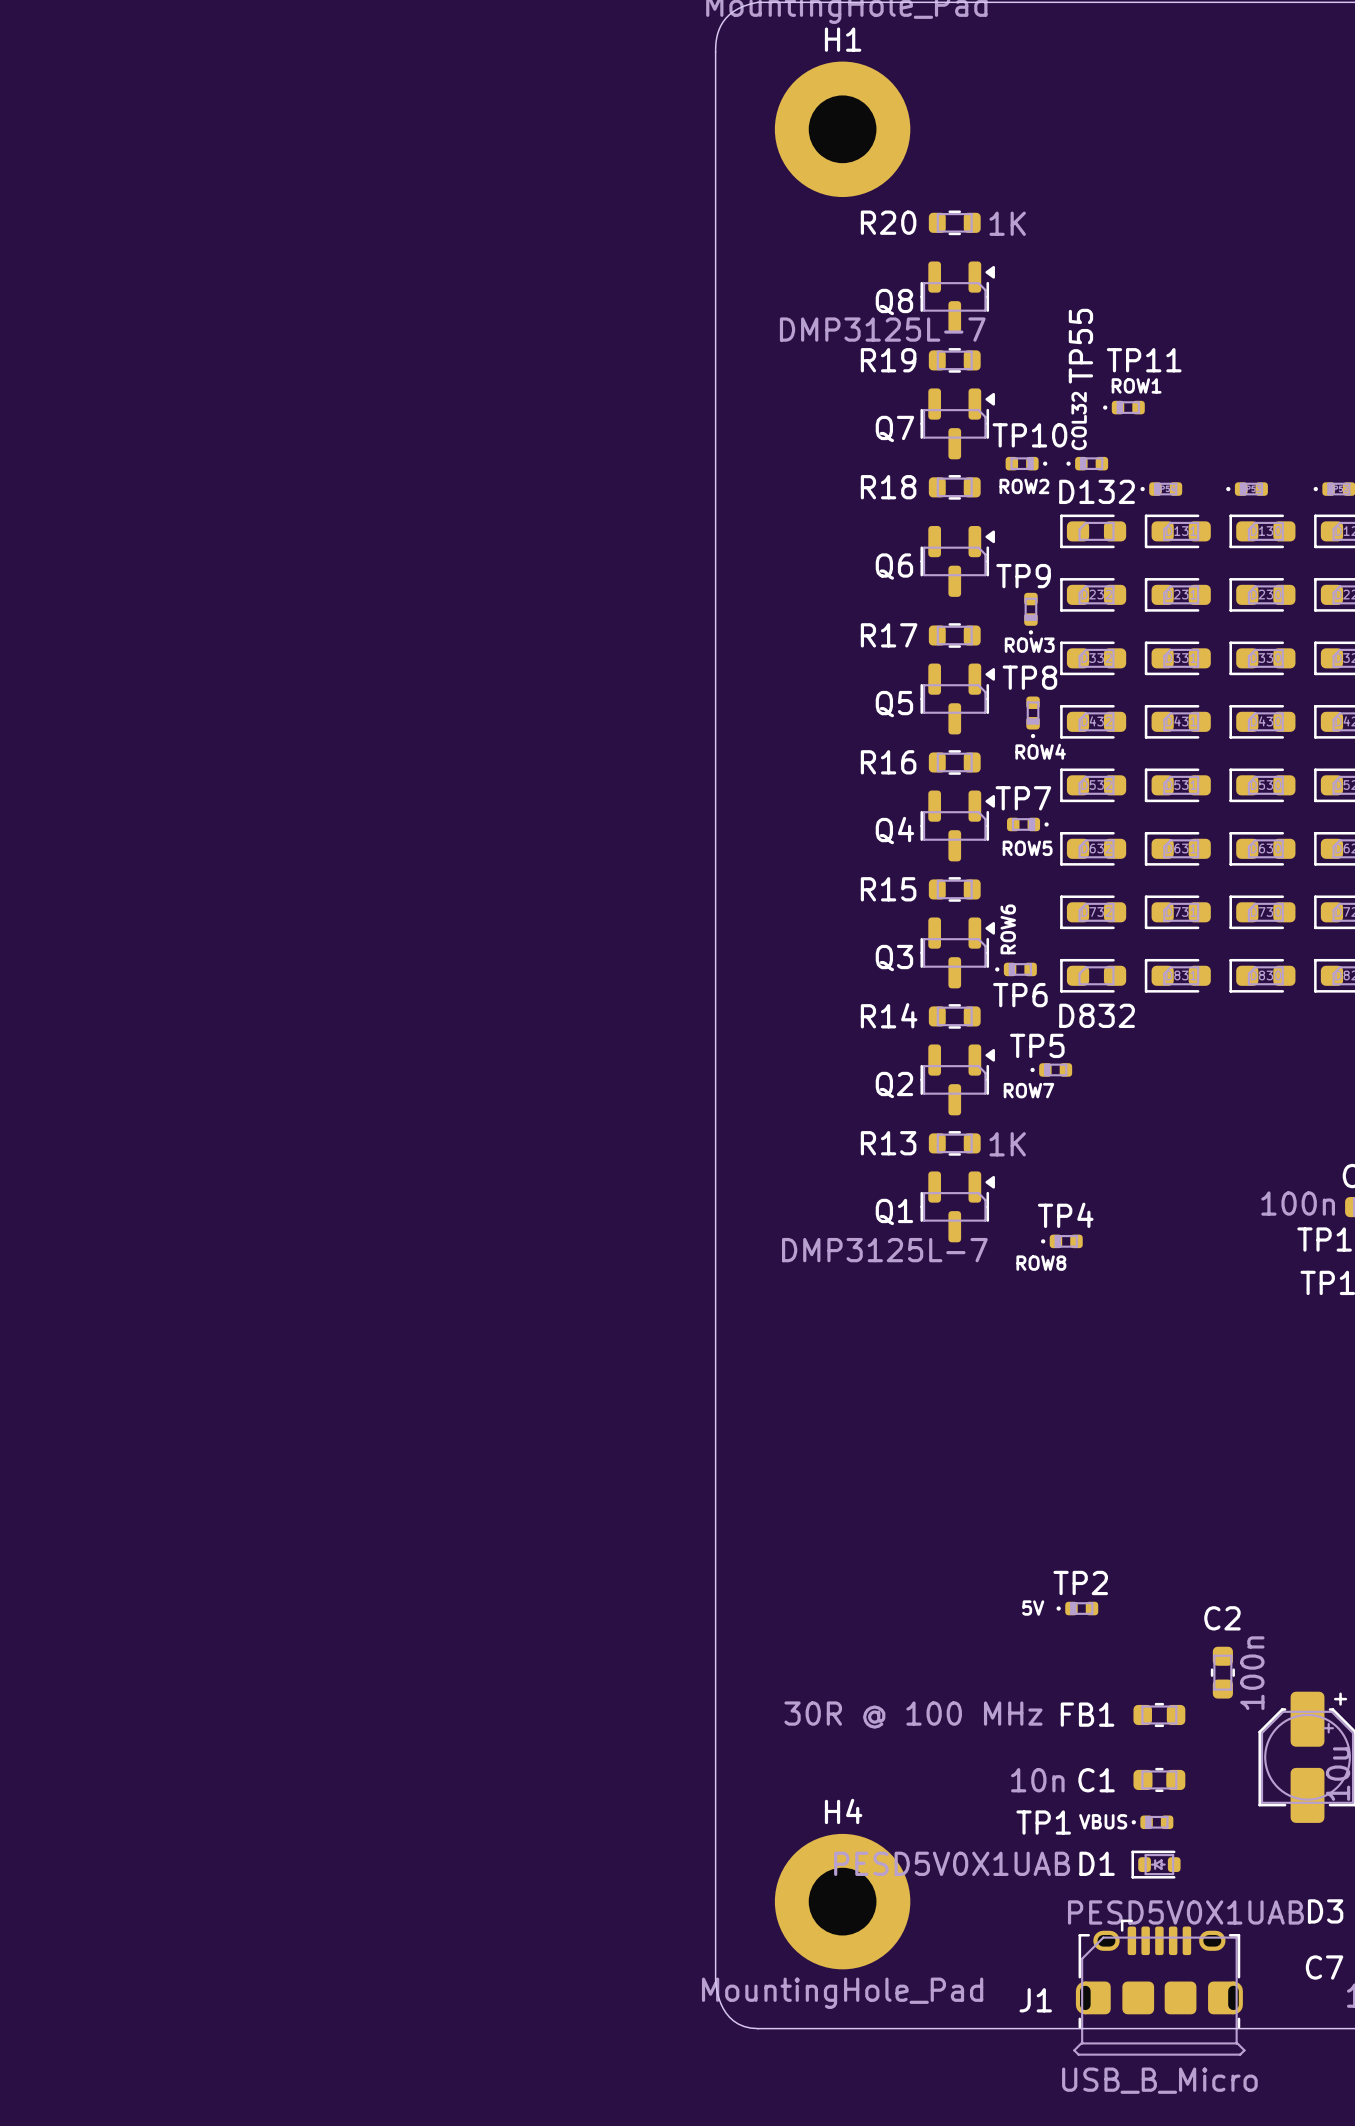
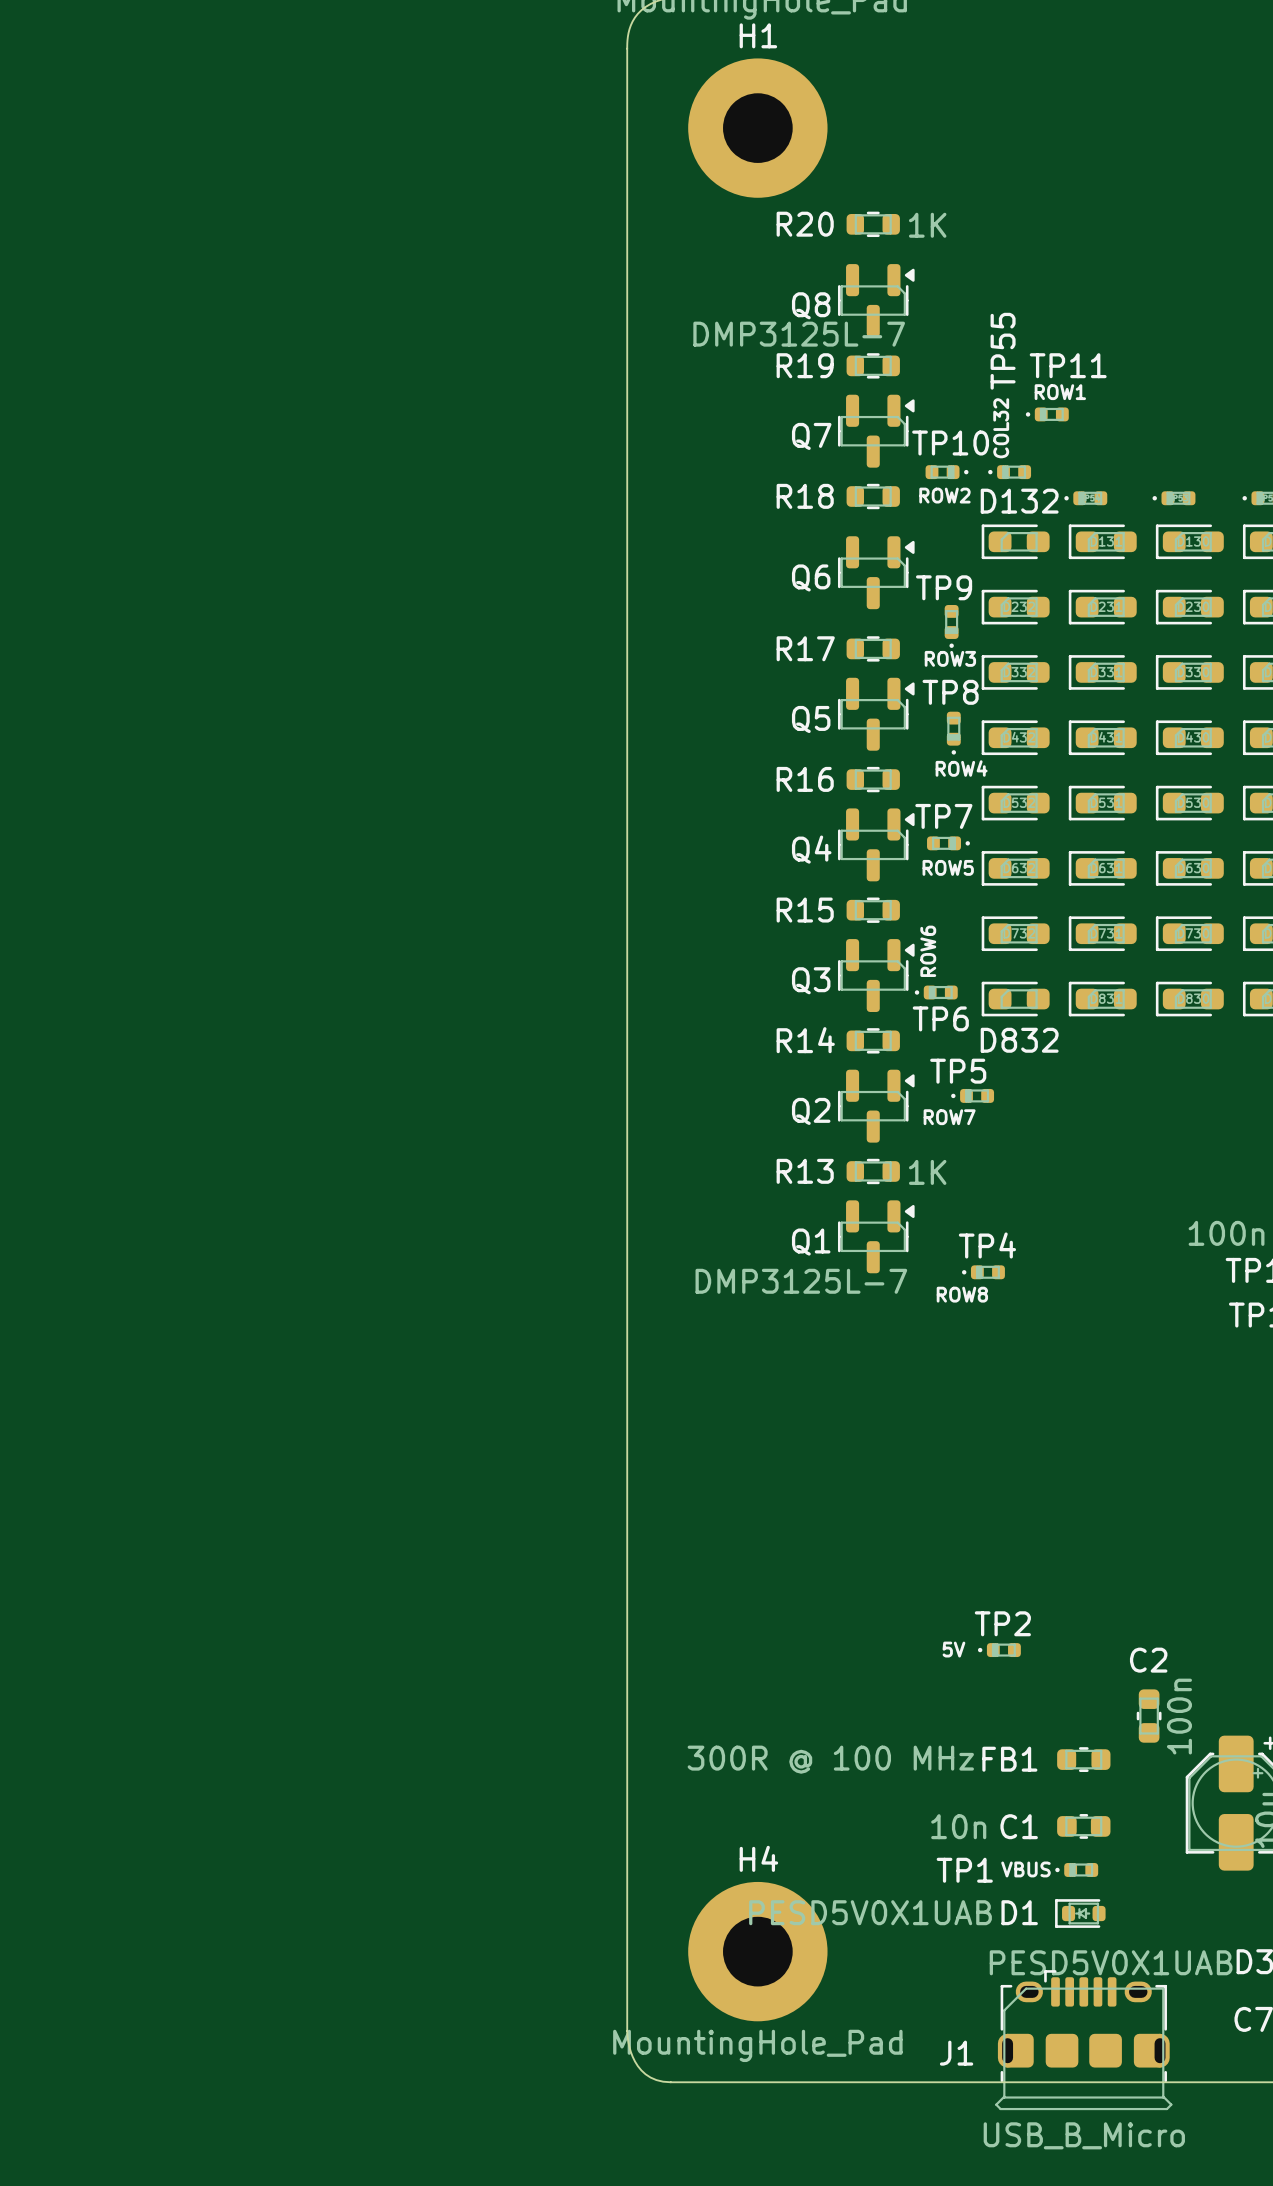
FB1 value: 30R @ 100 MHz (913, 1715) -> 300R @ 100 MHz (830, 1759)

